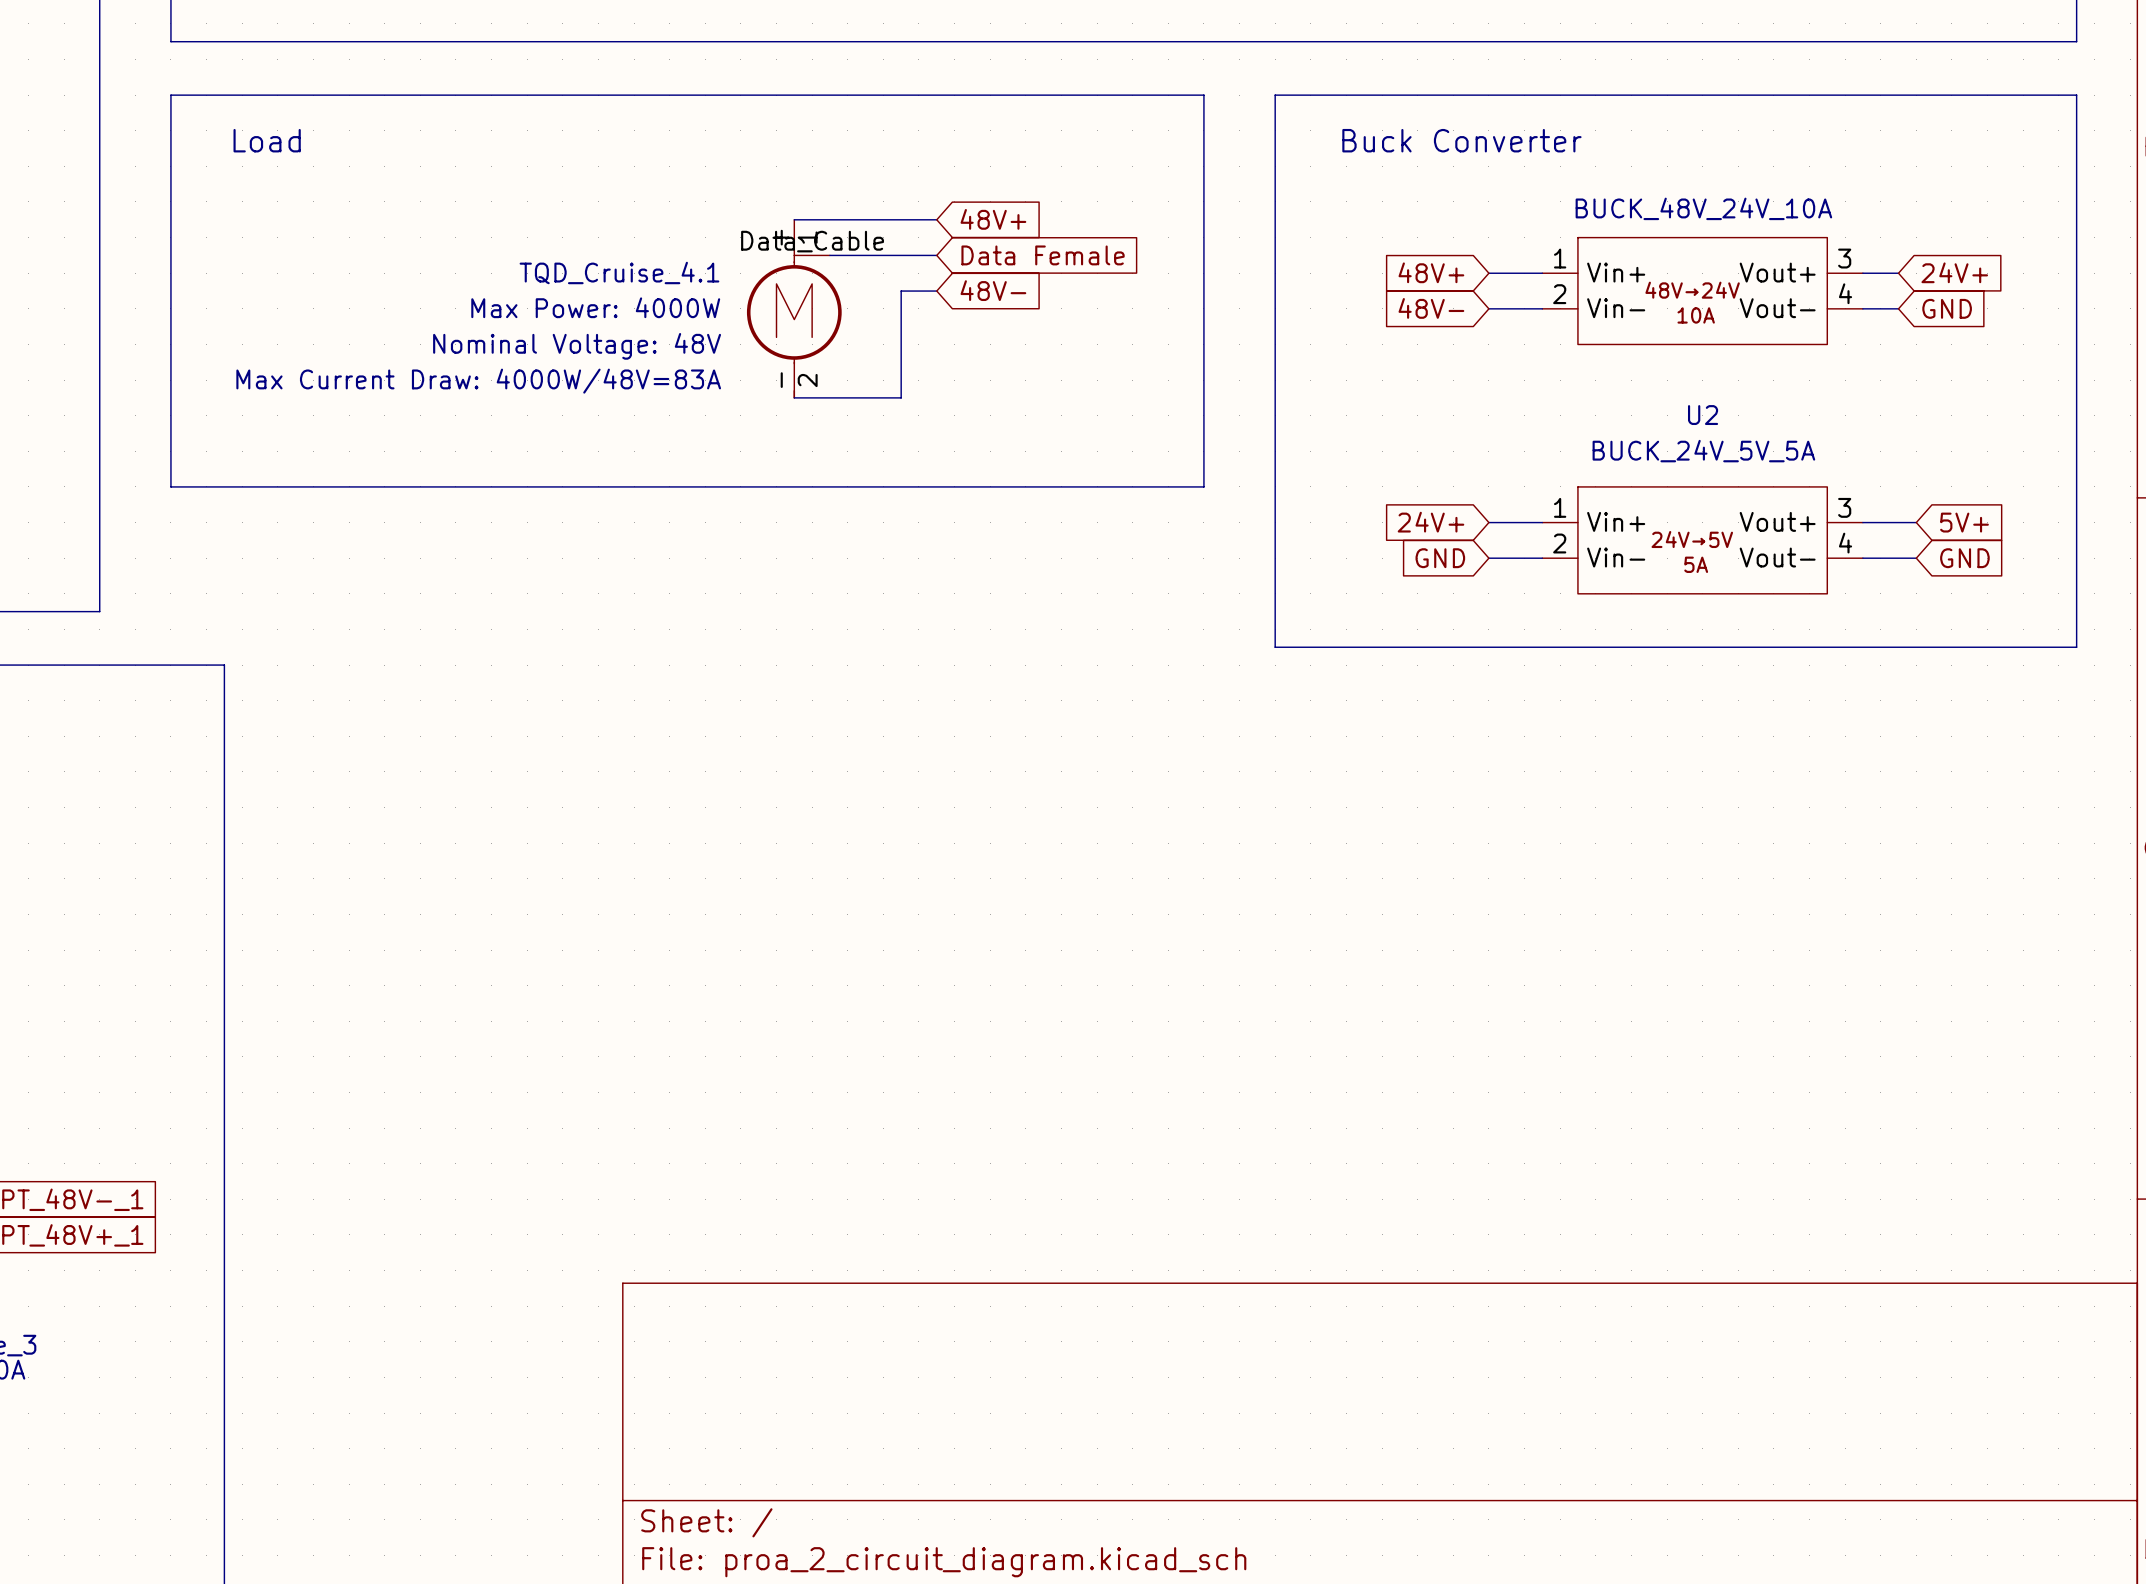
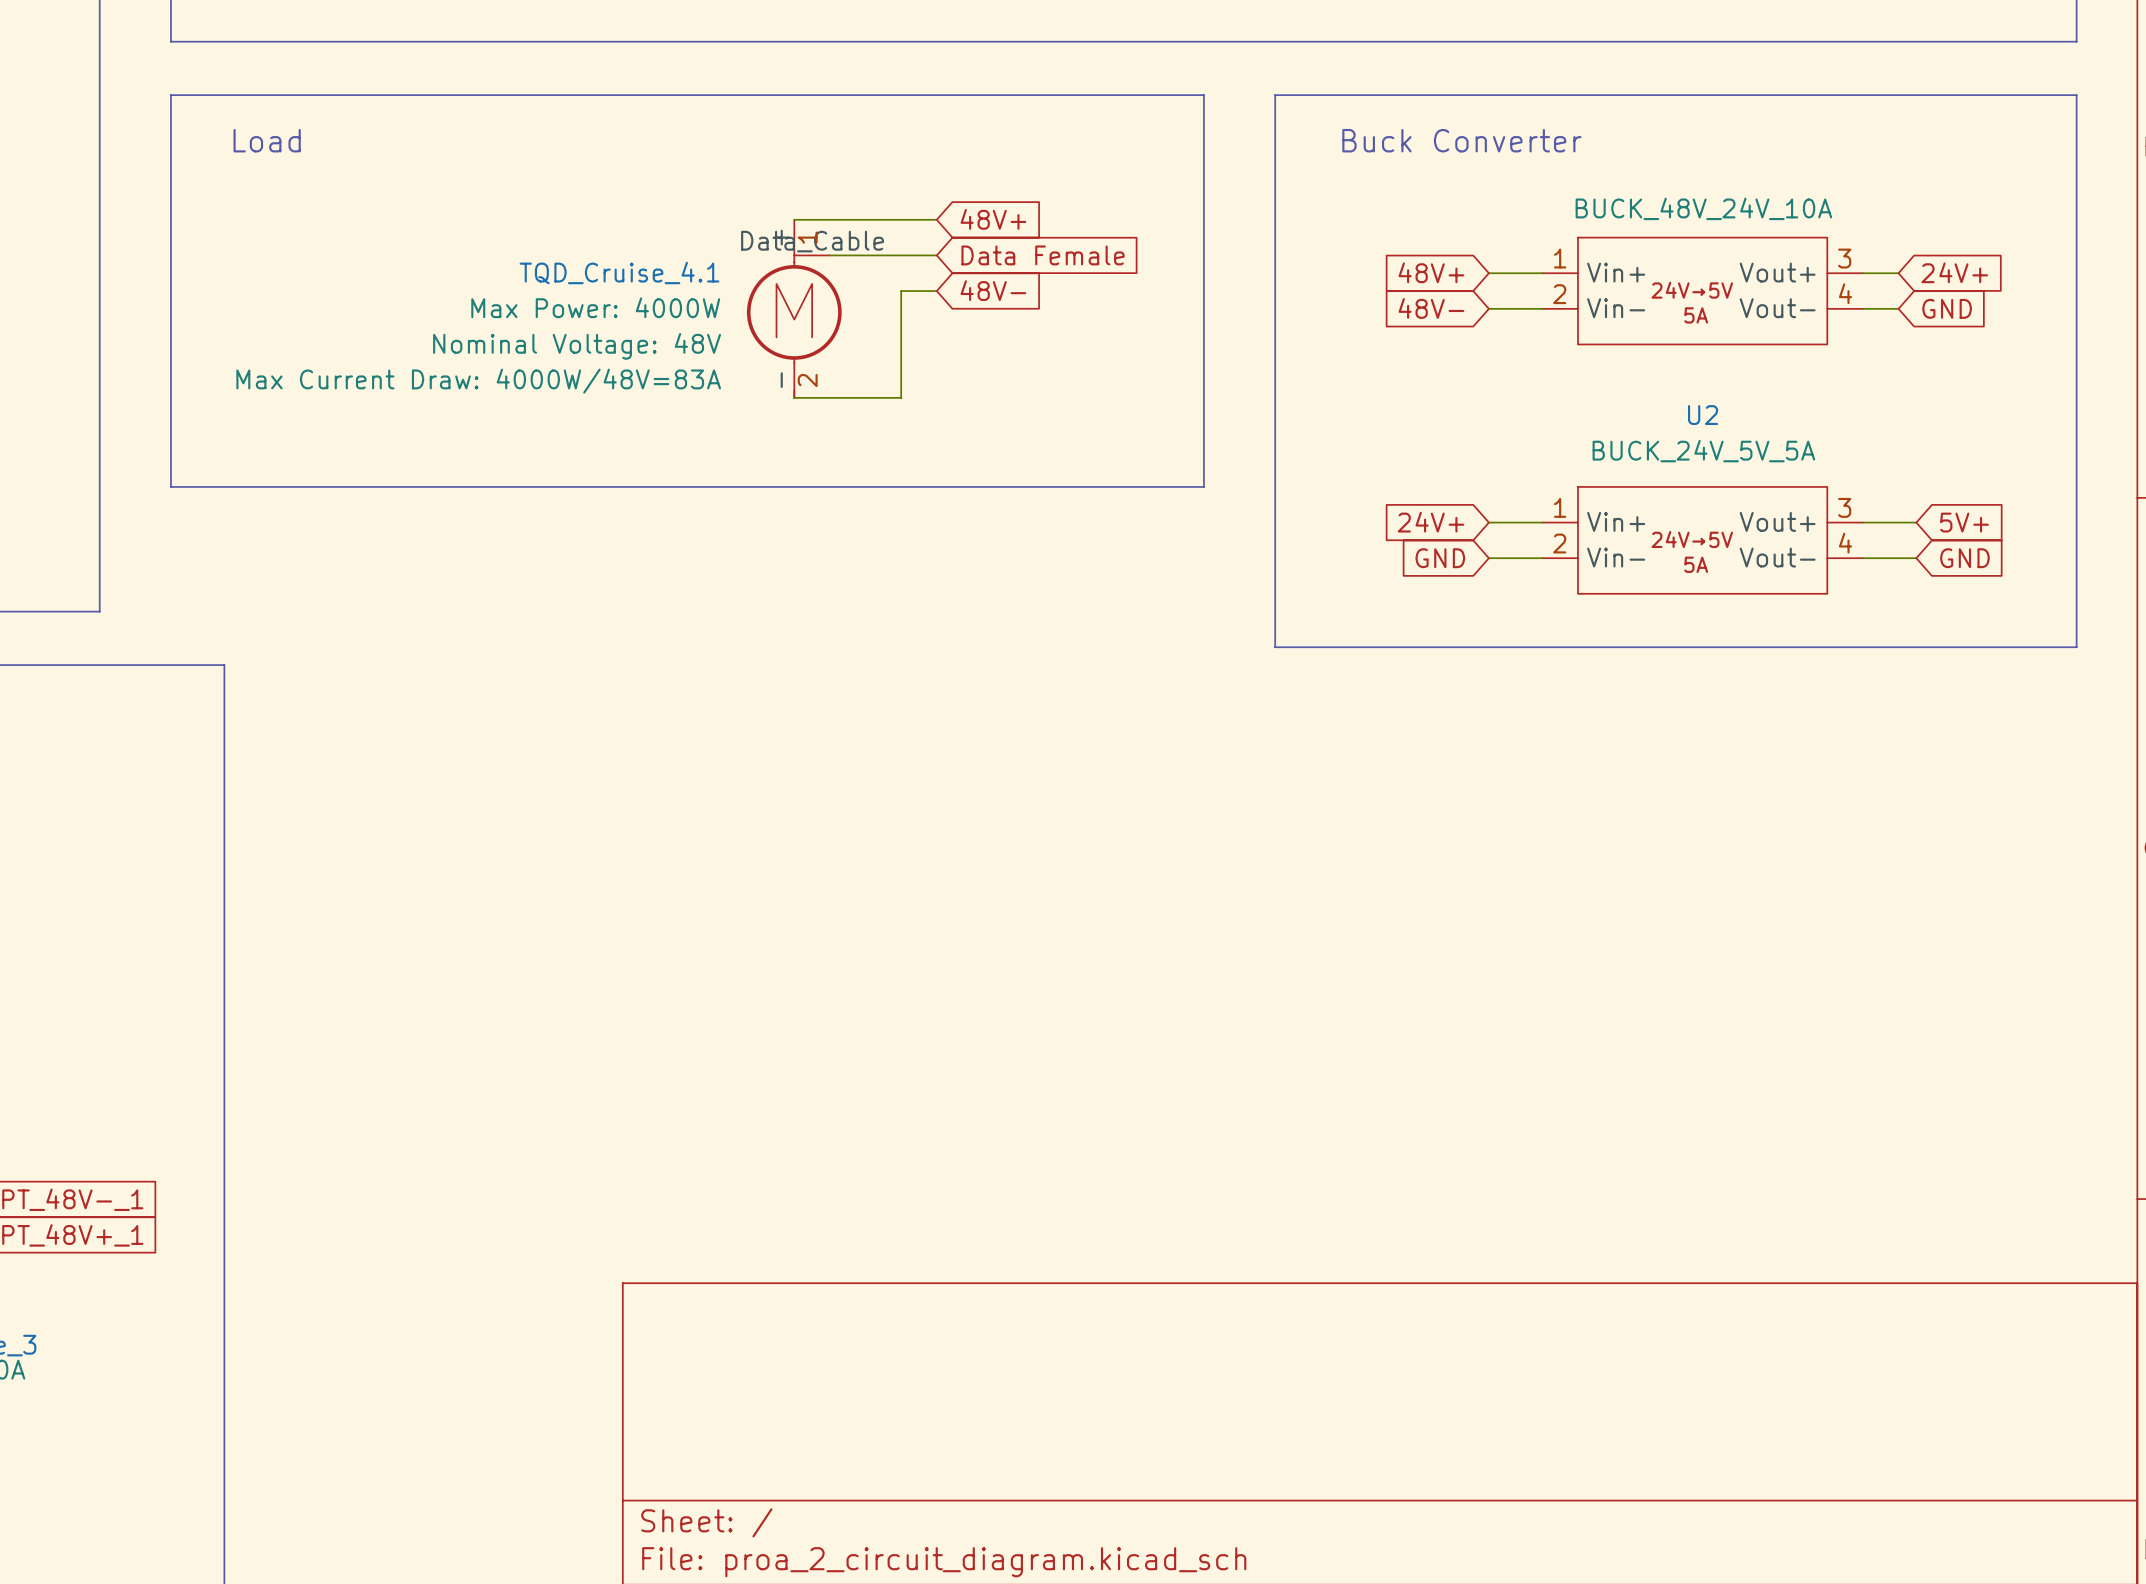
part text: 48V→24V (1692, 290) -> 24V→5V (1692, 290)
part text: 10A (1696, 315) -> 5A (1696, 315)

